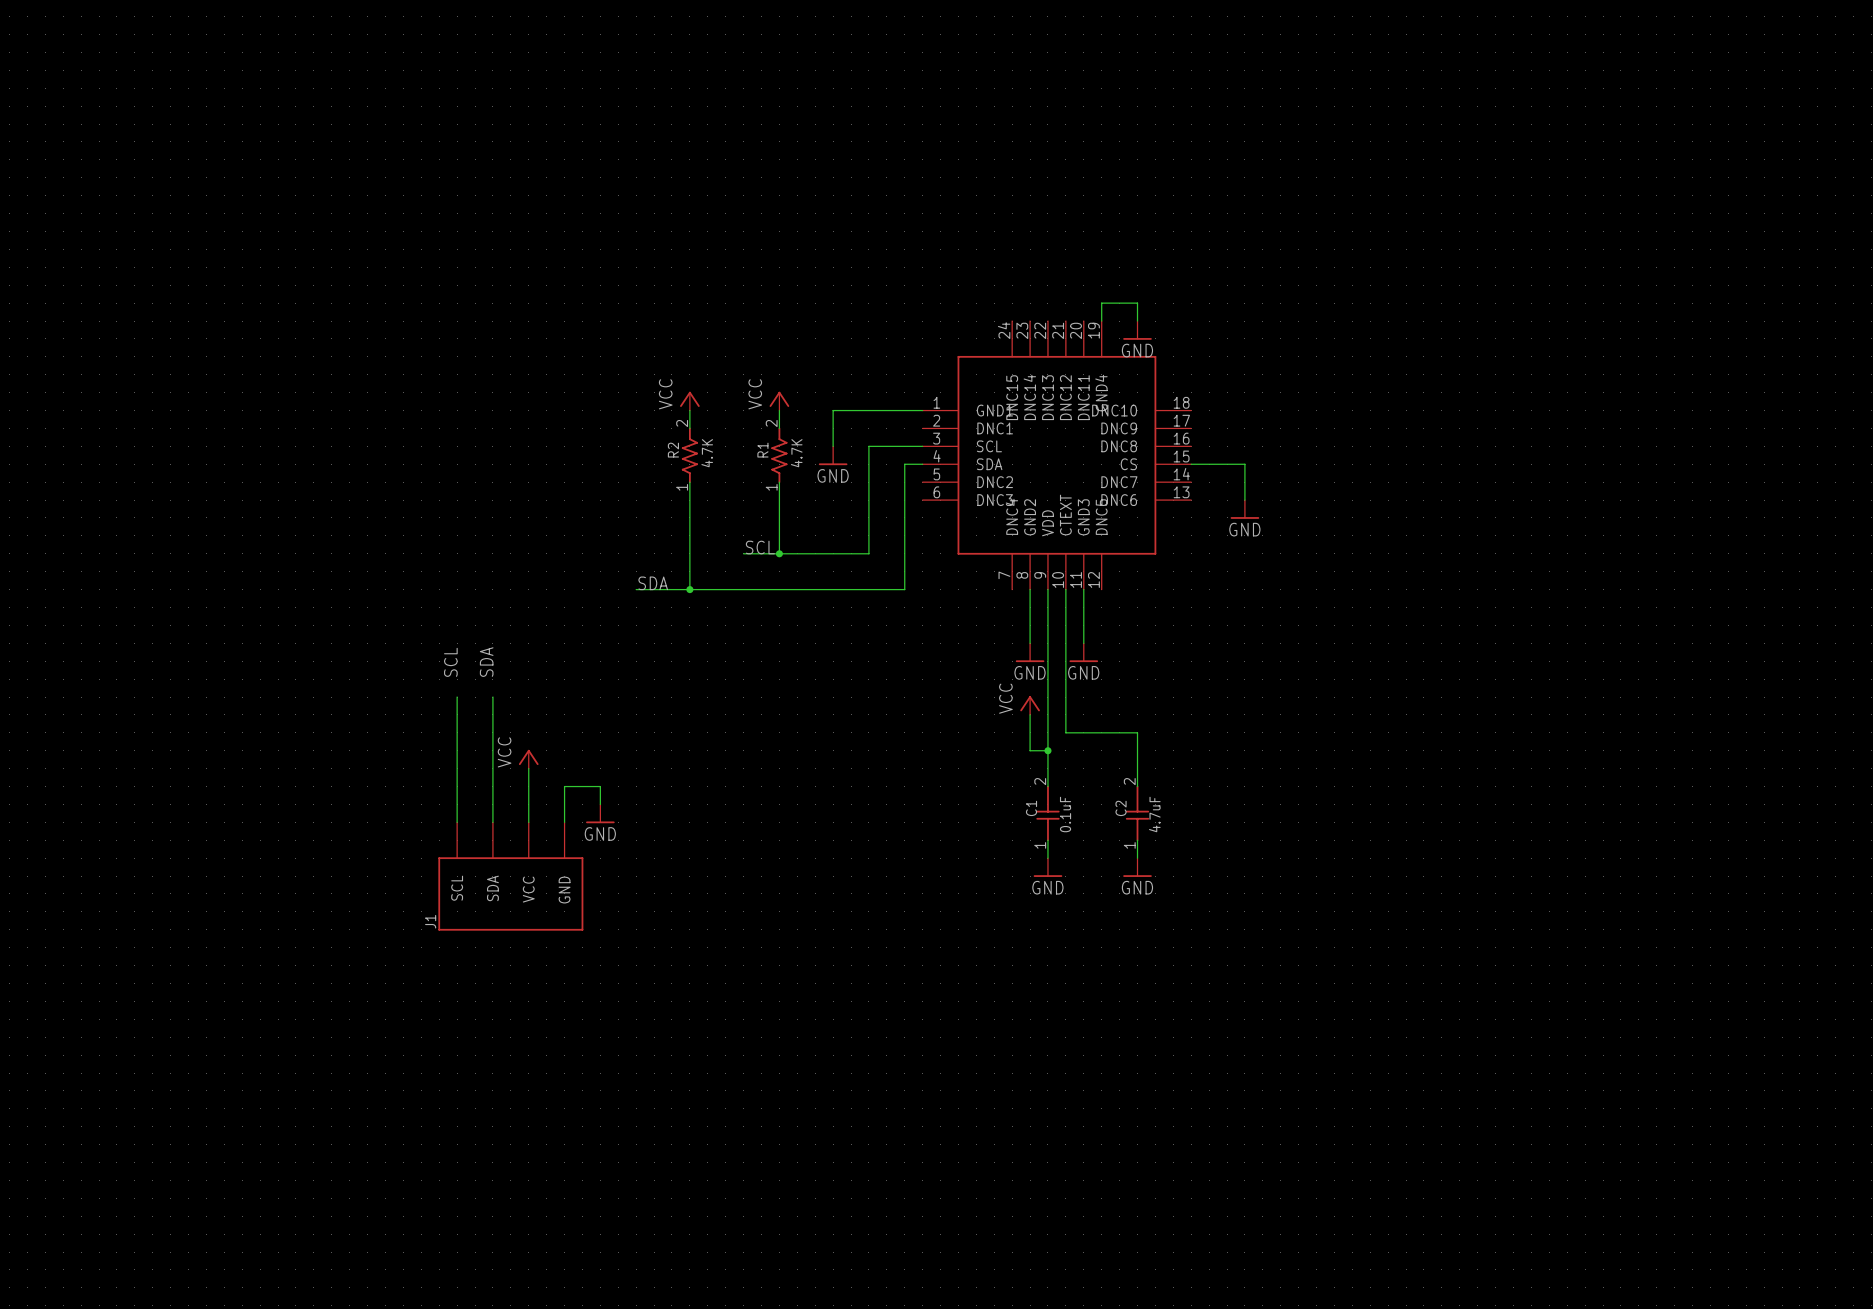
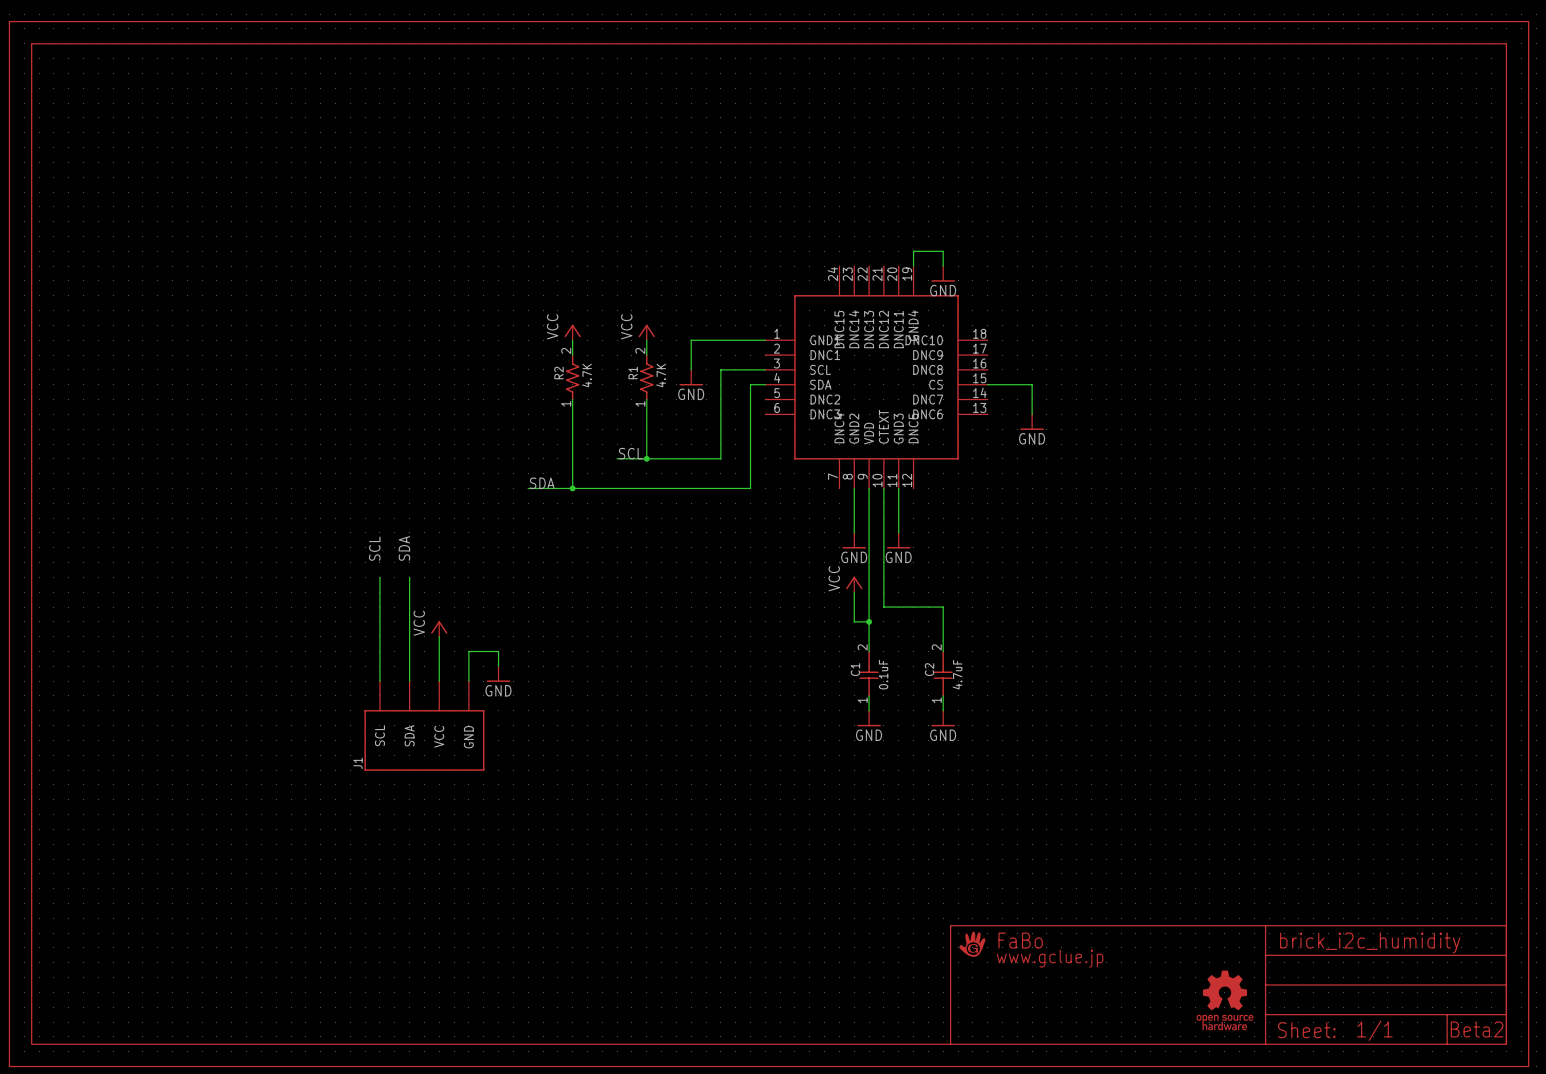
part: none -> (769, 544)
part: none -> (1225, 1000)
text: none -> Beta2 (1477, 1029)

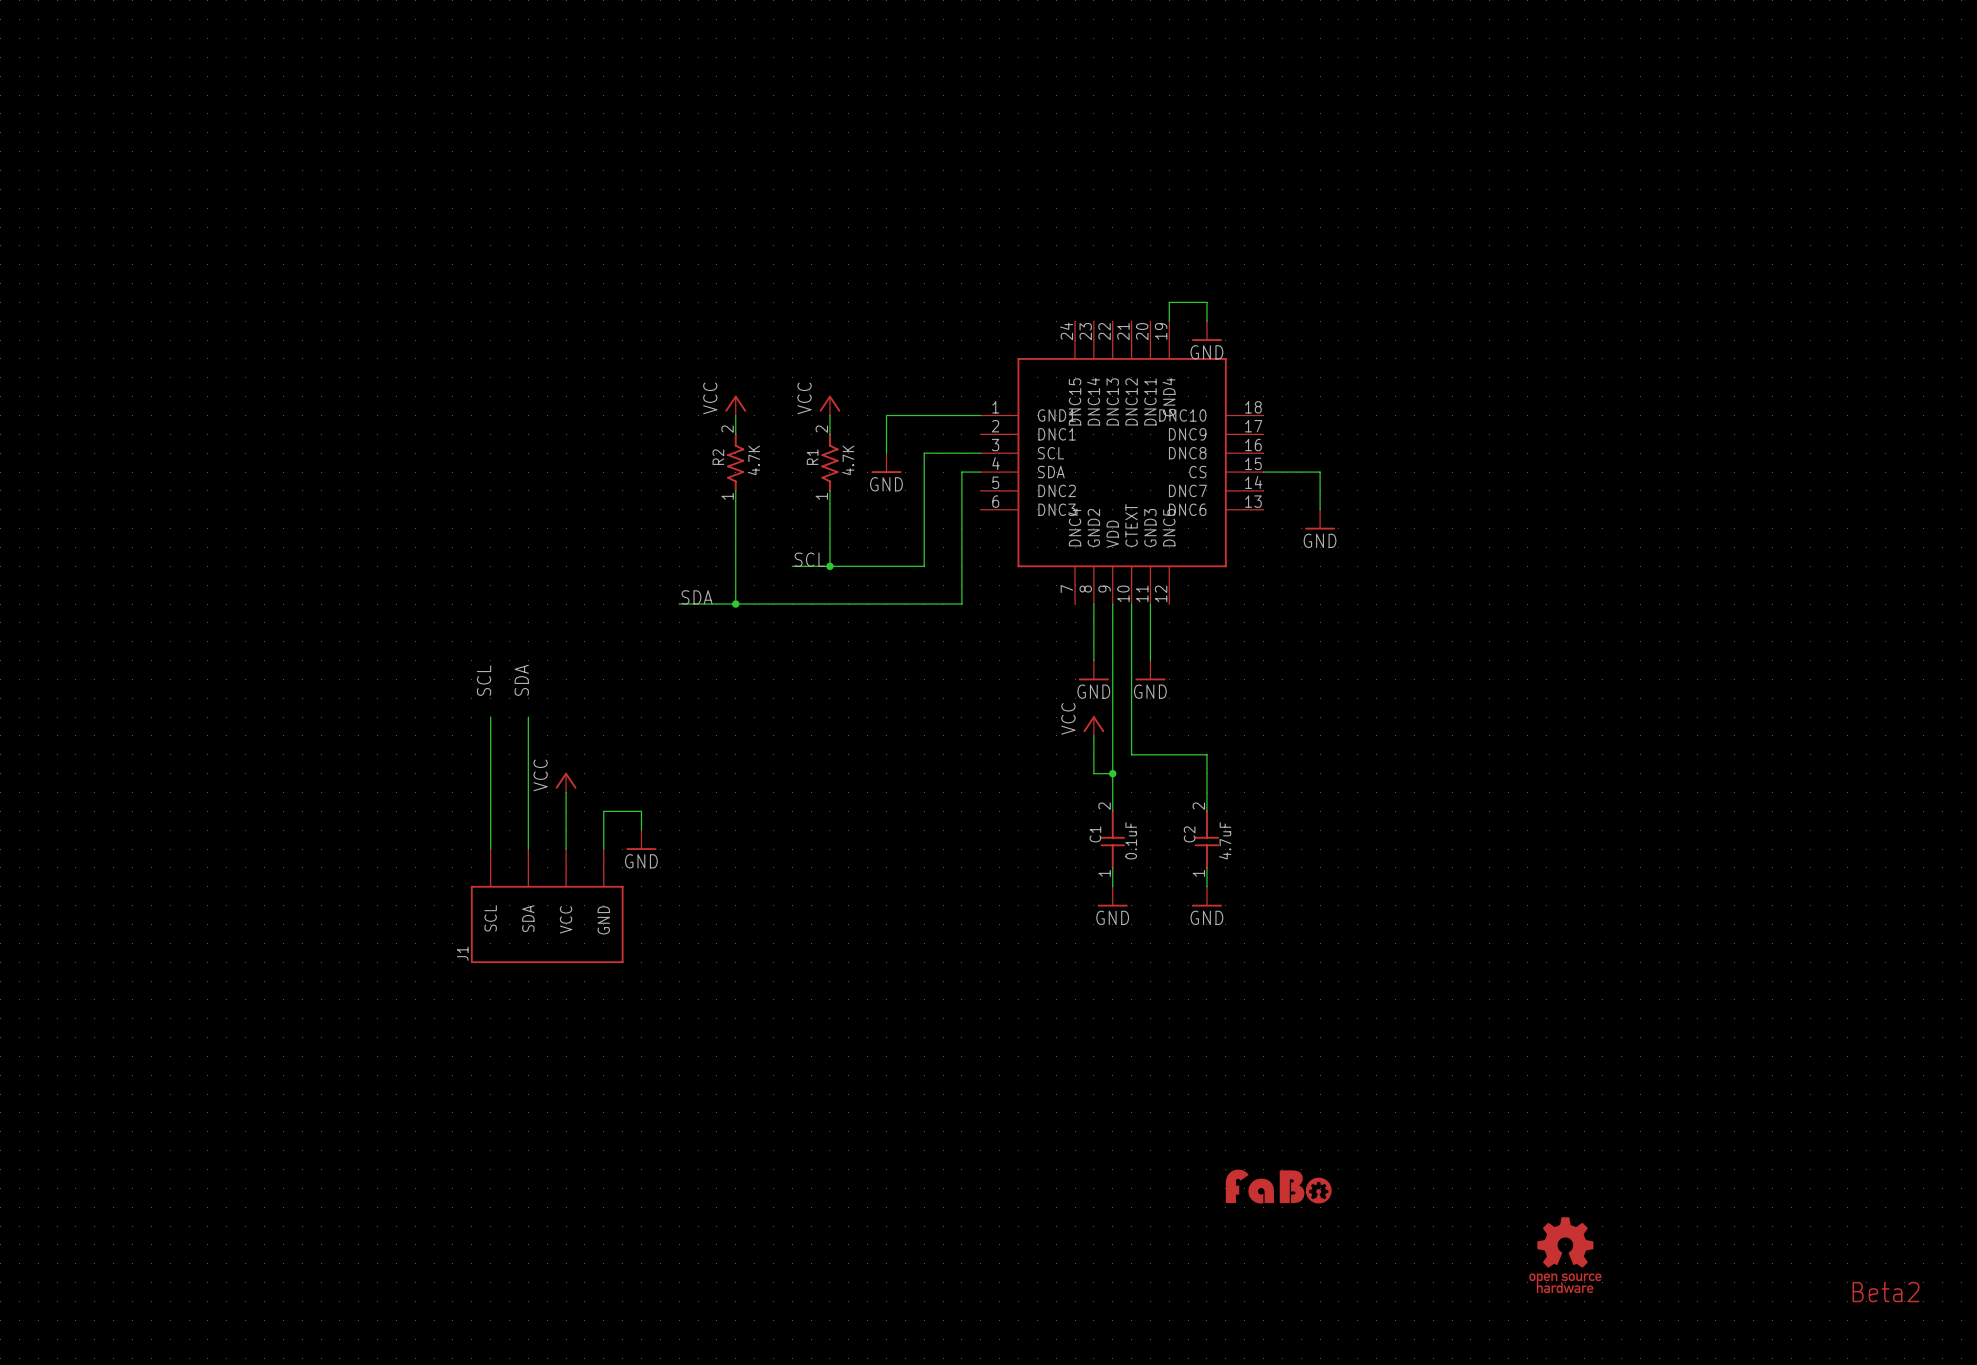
part: (769, 544) -> none
part: none -> (1278, 1186)

